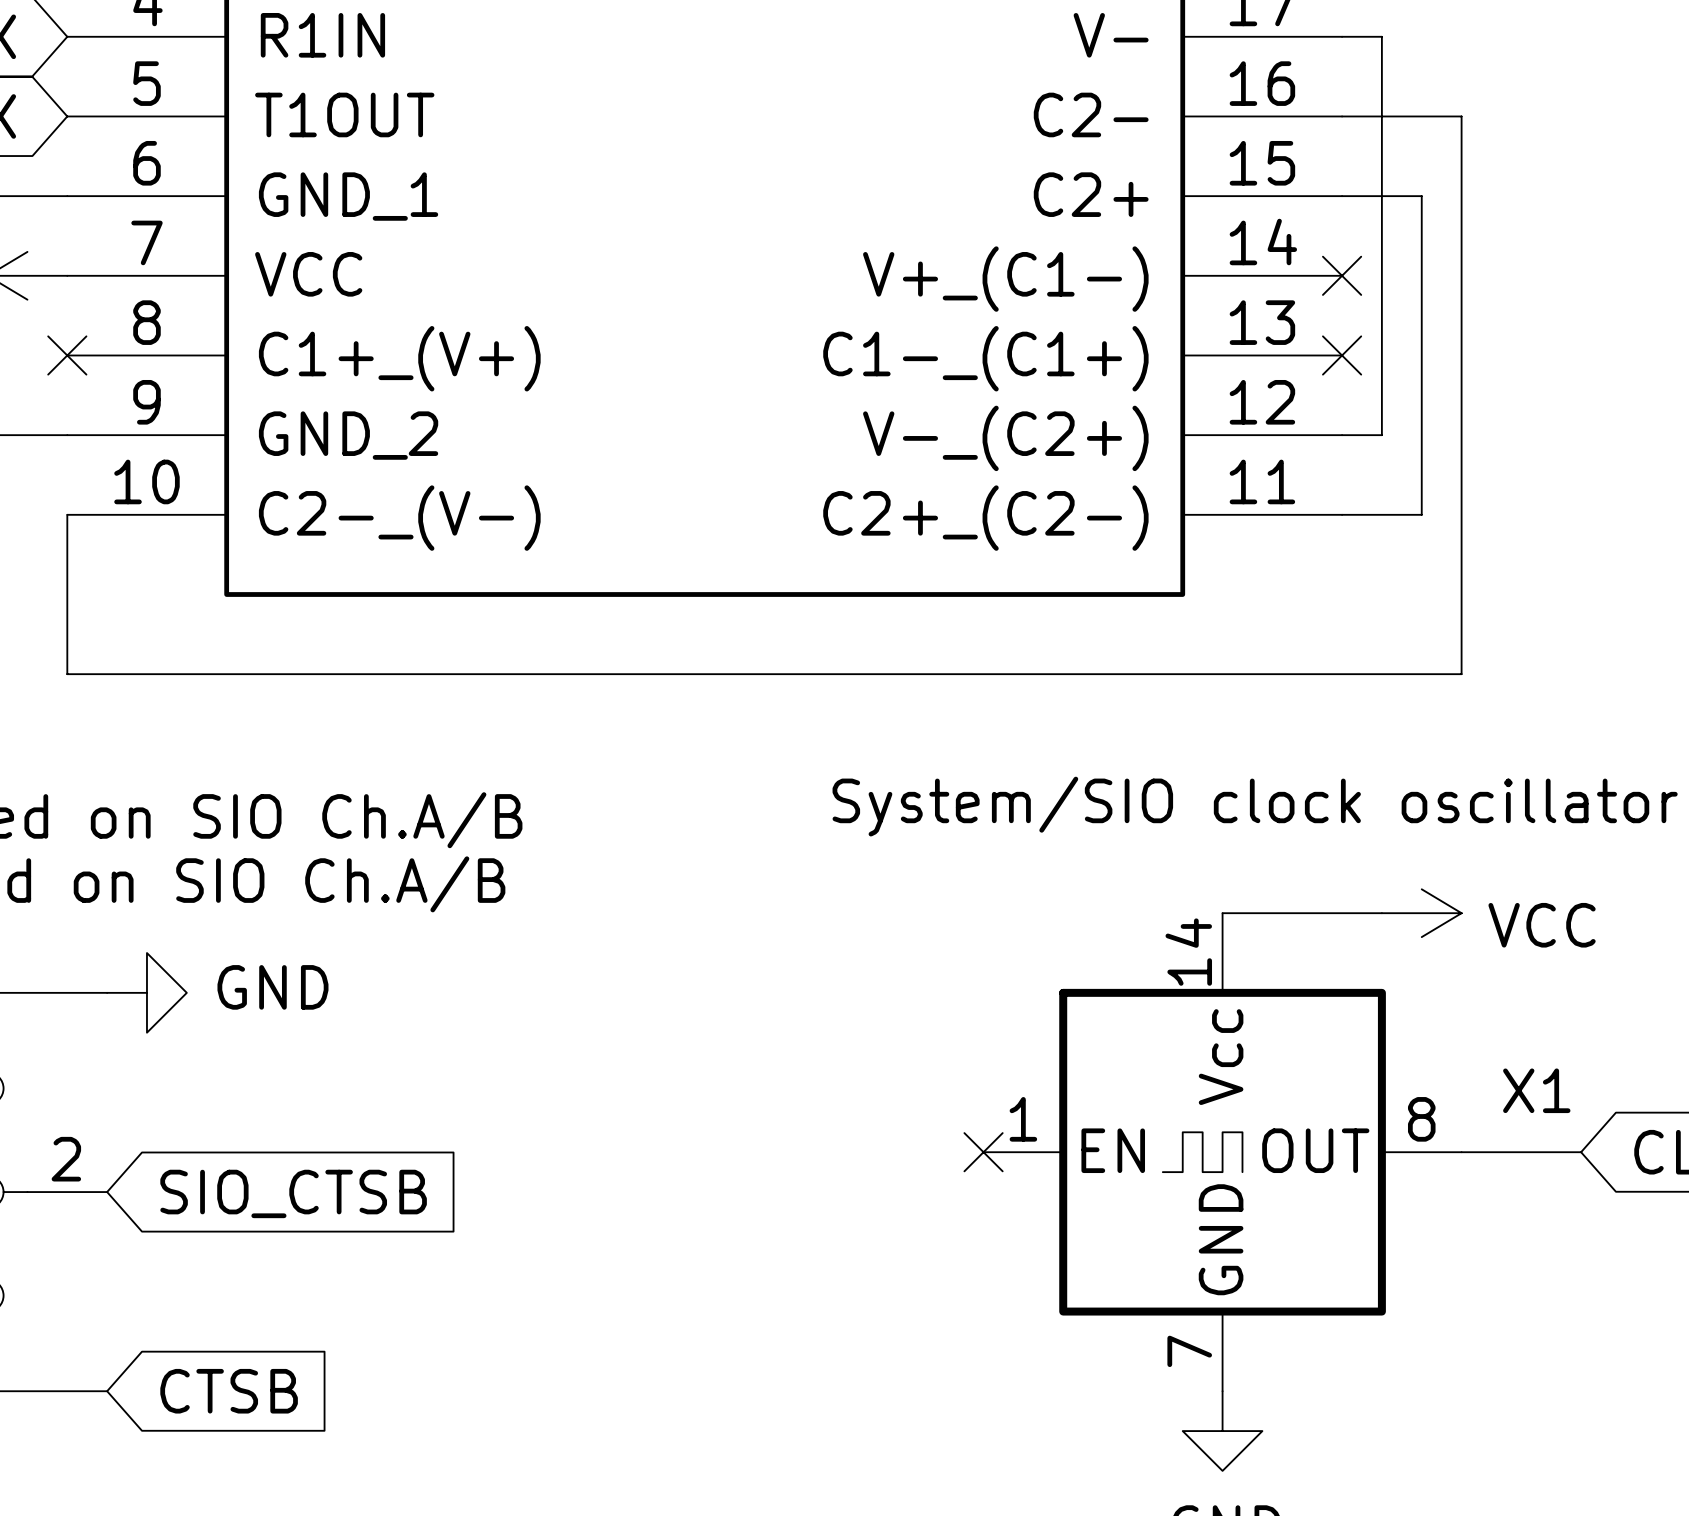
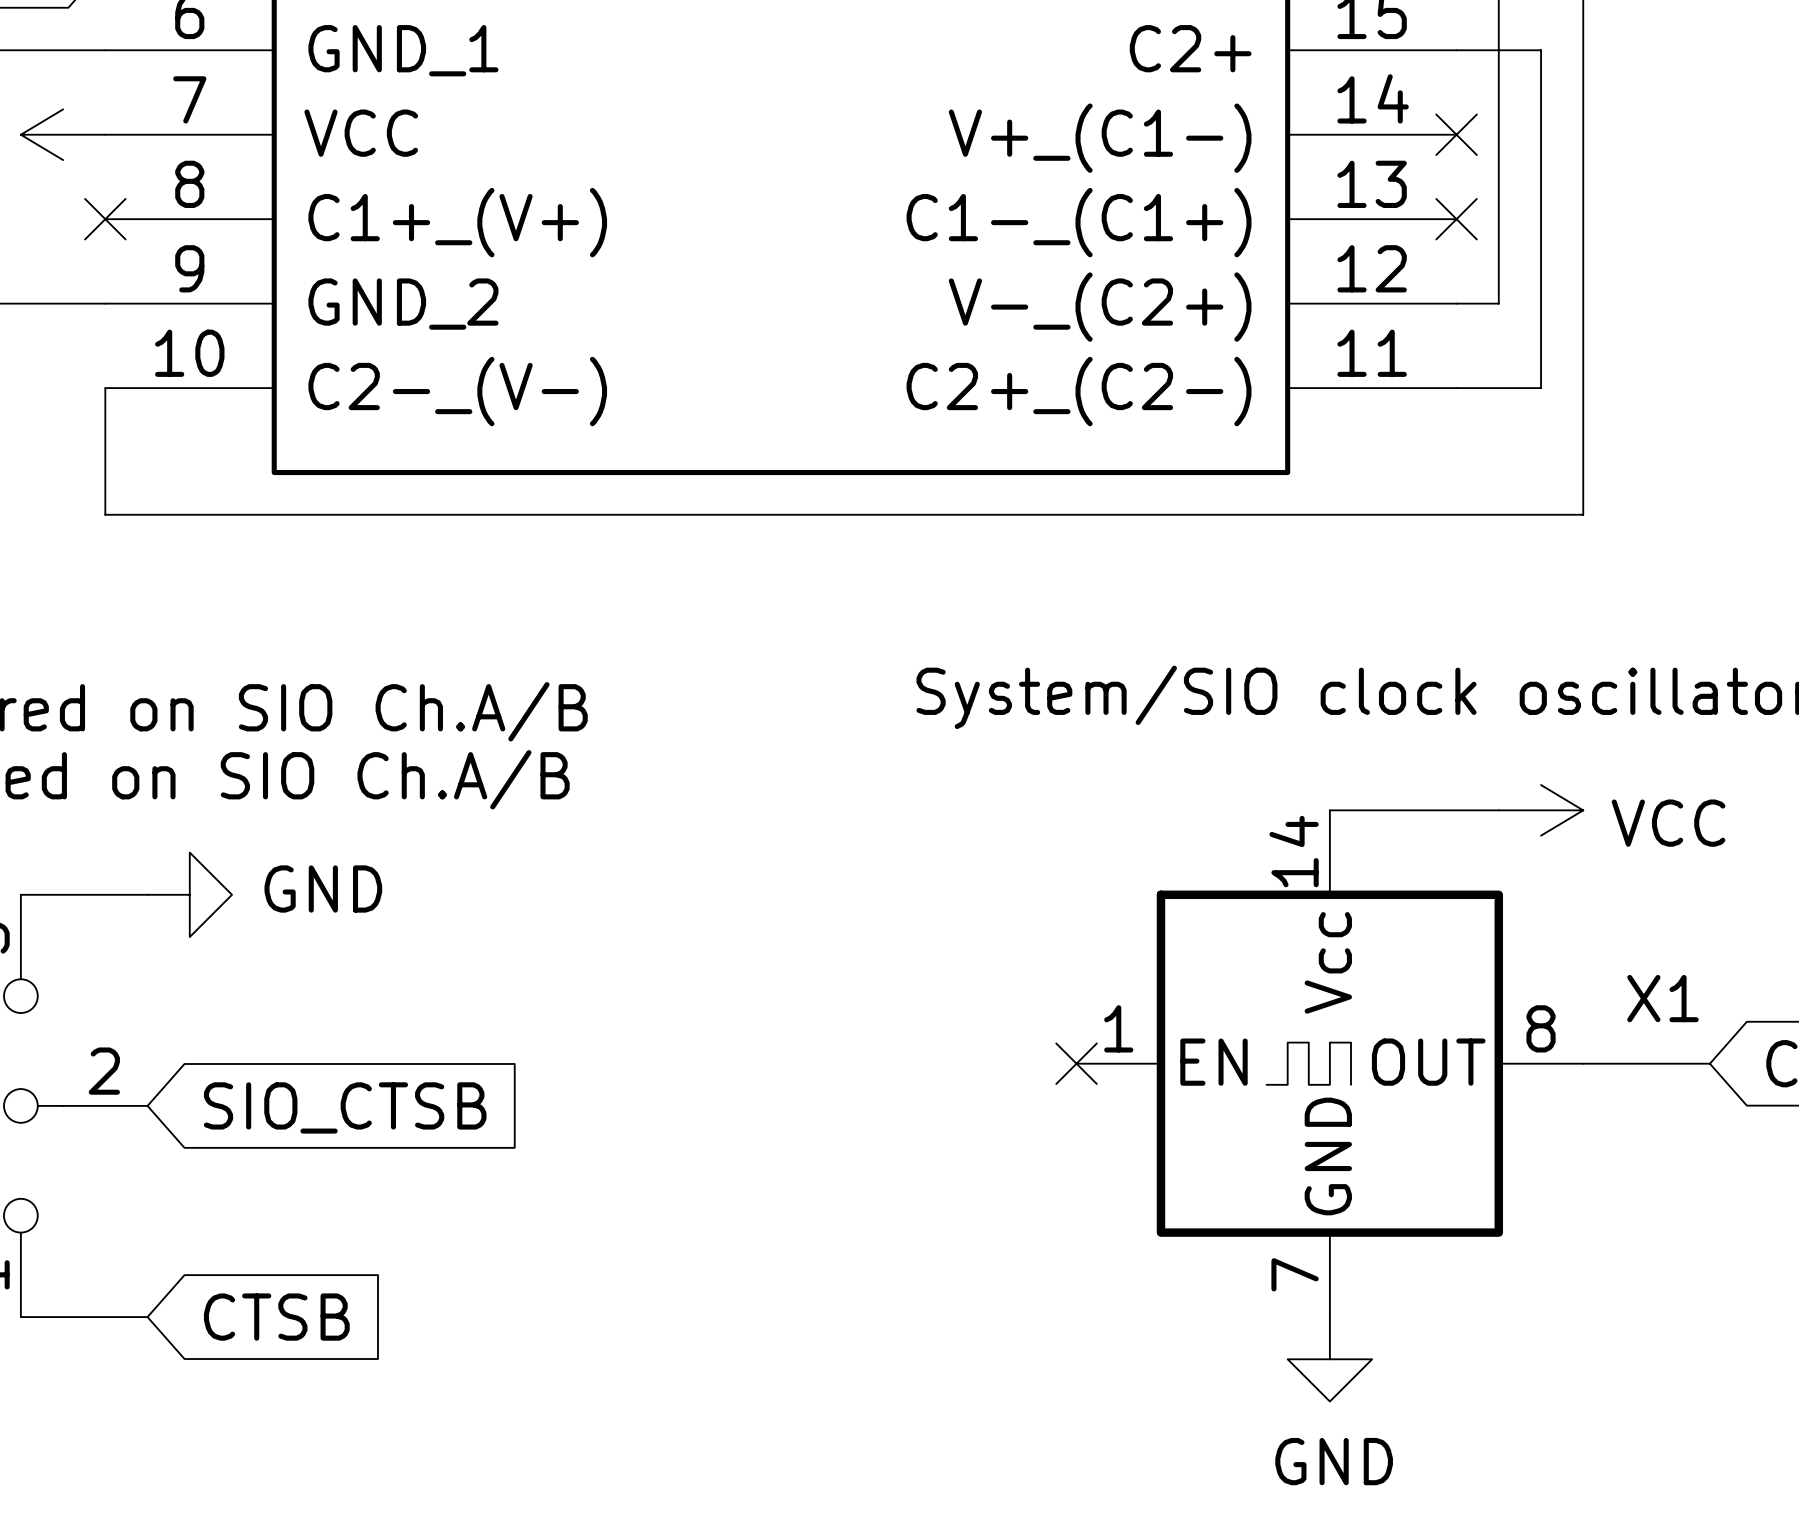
wire: (67, 634) (67, 674) (1461, 674) (1461, 634) -> (105, 514) (1583, 514)

